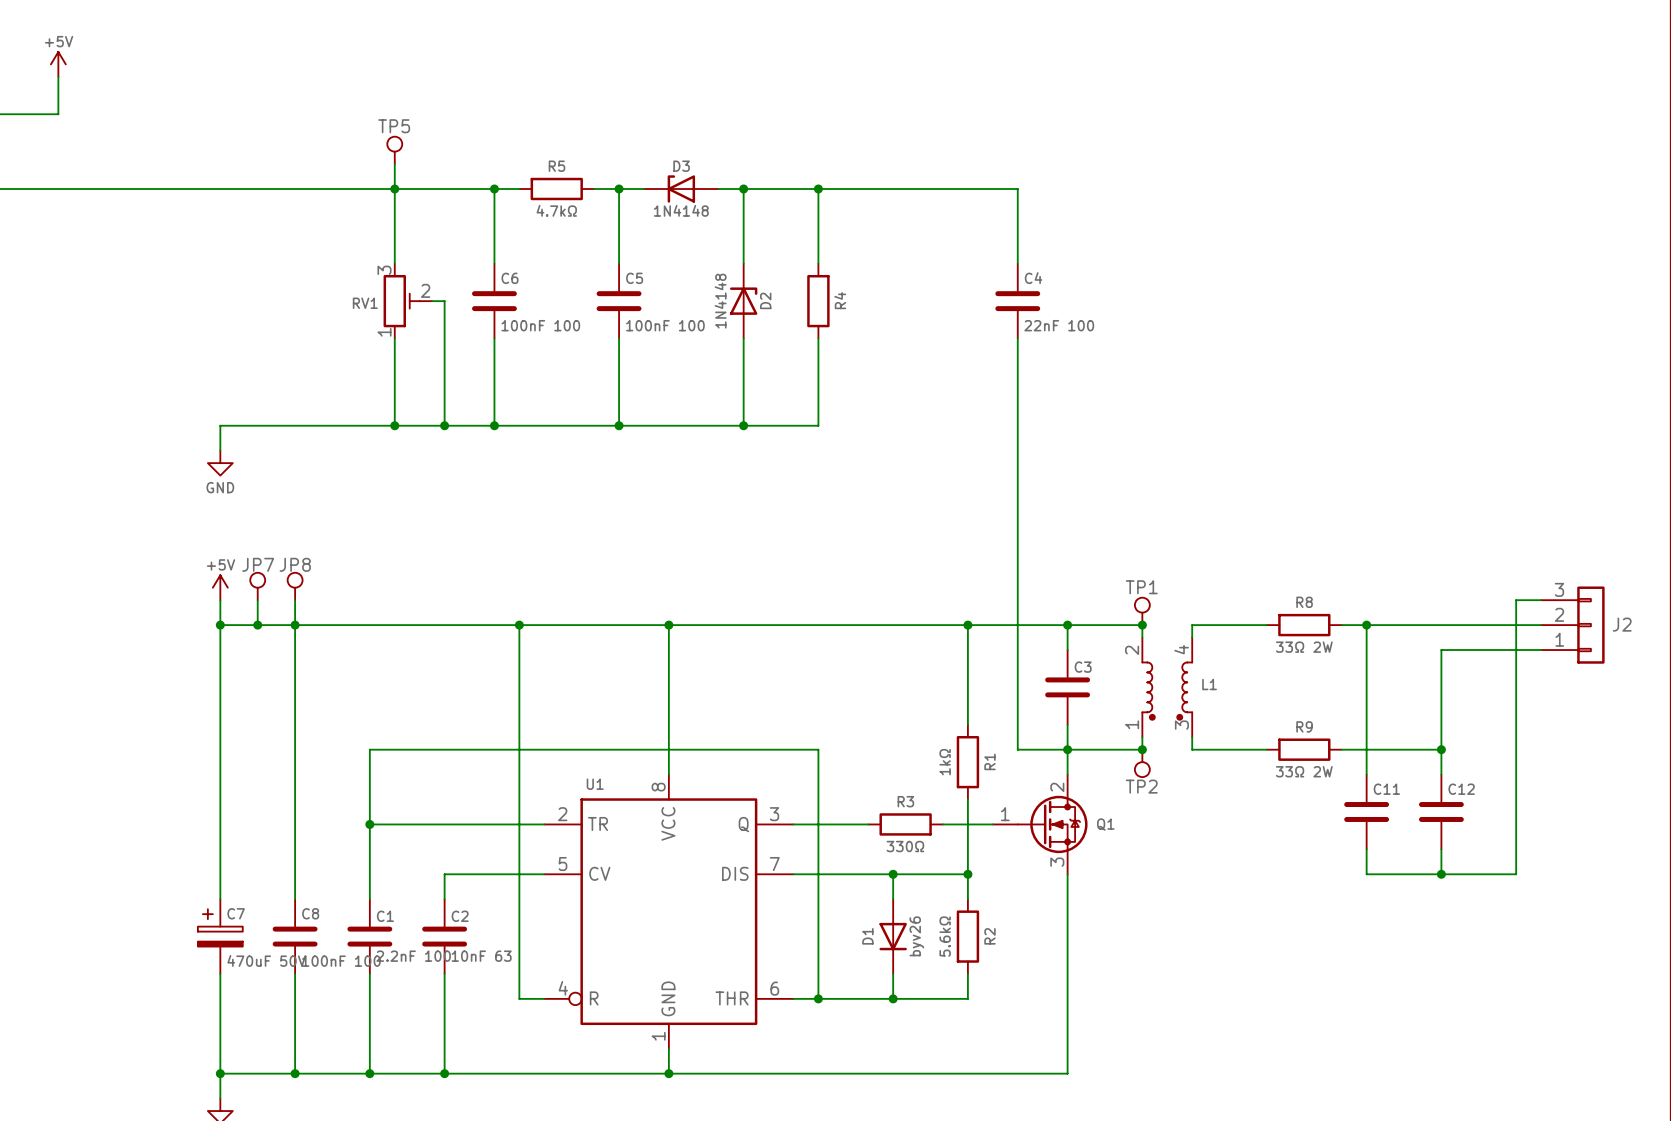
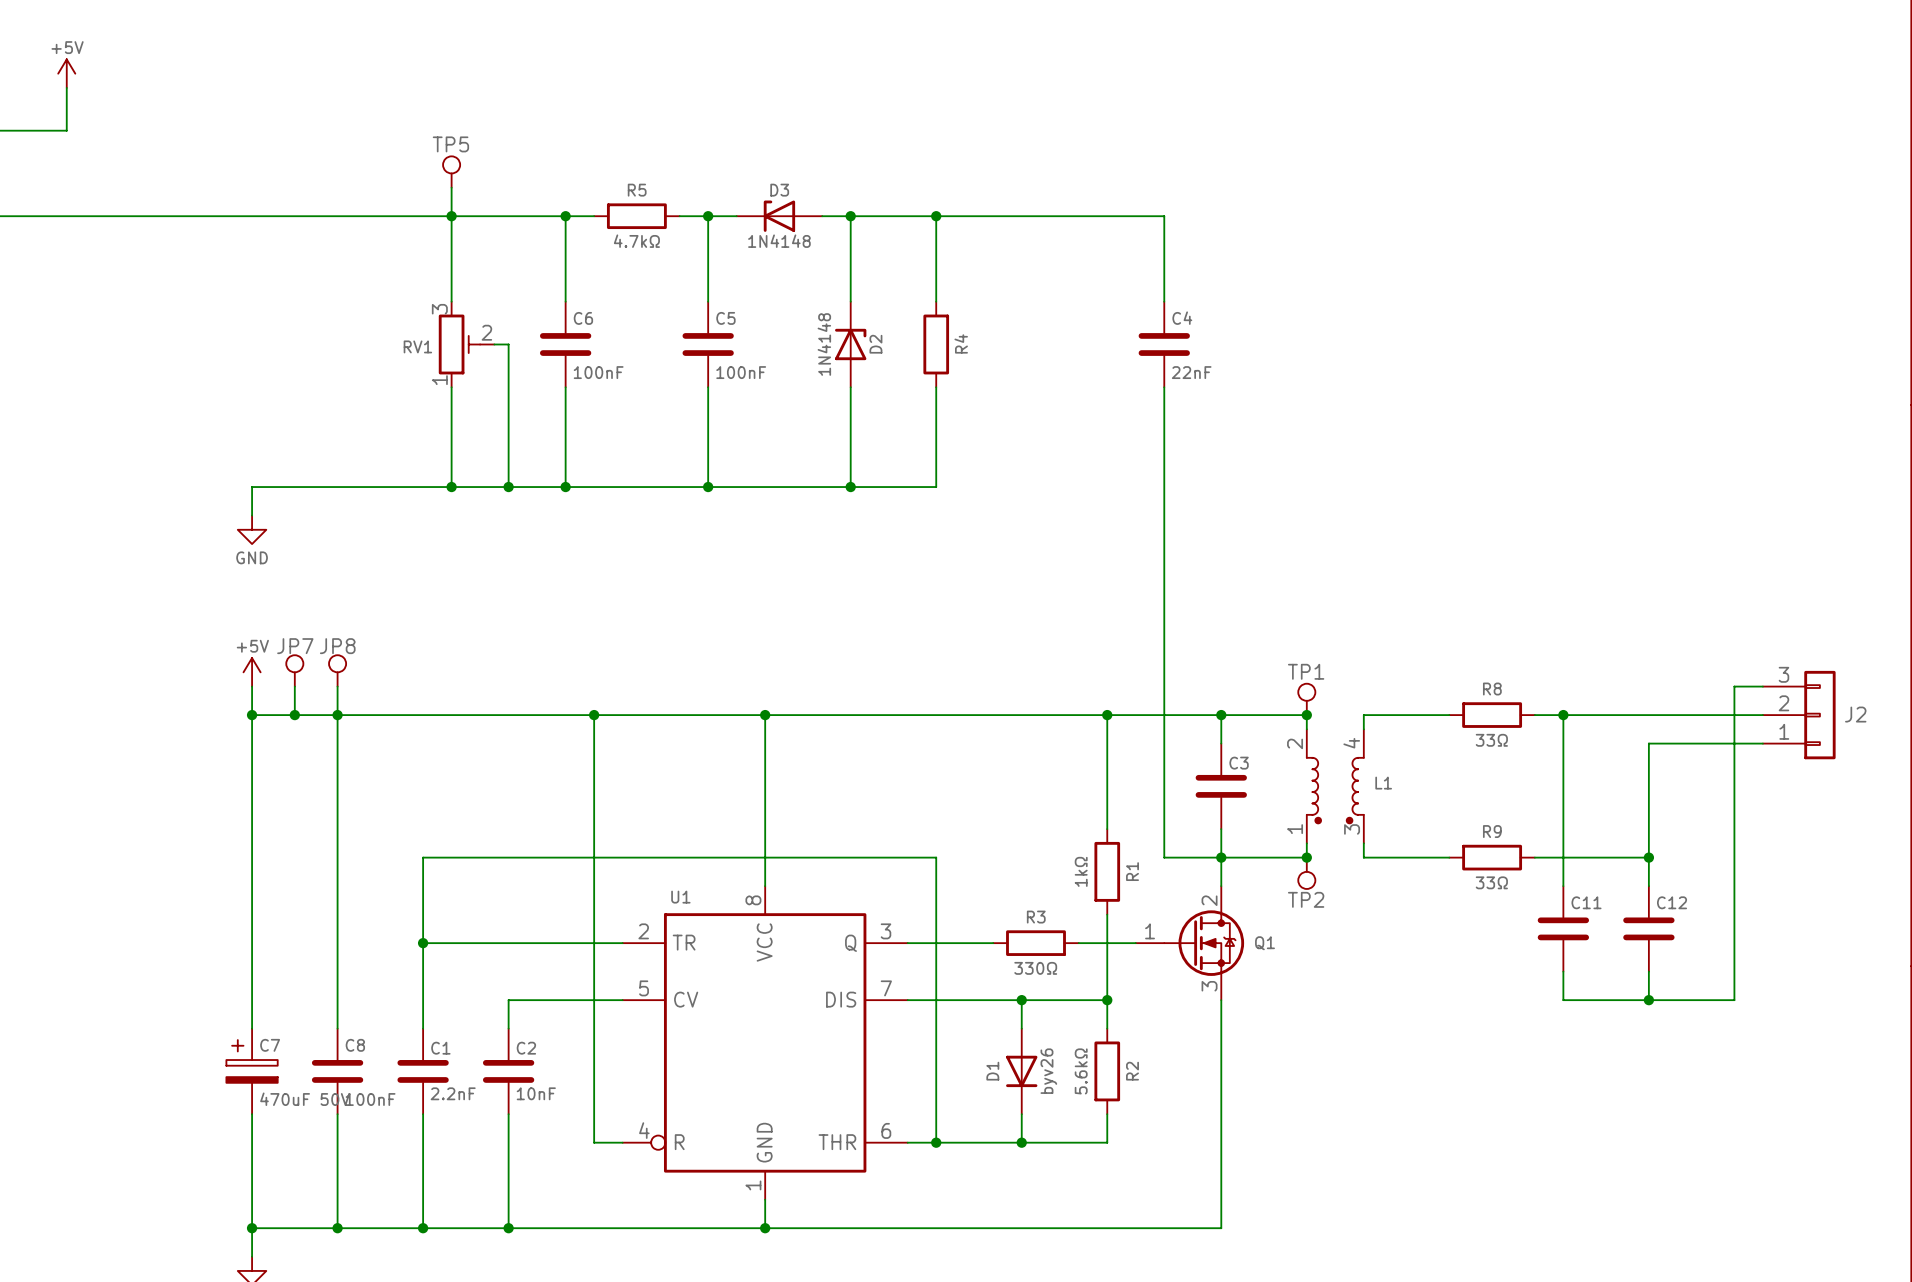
C6 value: 100nF 100 (540, 325) -> 100nF (598, 372)
C5 value: 100nF 100 (665, 325) -> 100nF (741, 372)
C4 value: 22nF 100 (1059, 325) -> 22nF (1191, 372)
R8 value: 33Ω 2W (1304, 647) -> 33Ω (1491, 740)
R9 value: 33Ω 2W (1304, 771) -> 33Ω (1491, 882)
C1 value: 2.2nF 100 (413, 956) -> 2.2nF (453, 1093)
C2 value: 10nF 63 (481, 956) -> 10nF (536, 1093)
C8 value: 100nF 100 (341, 961) -> 100nF (370, 1099)

